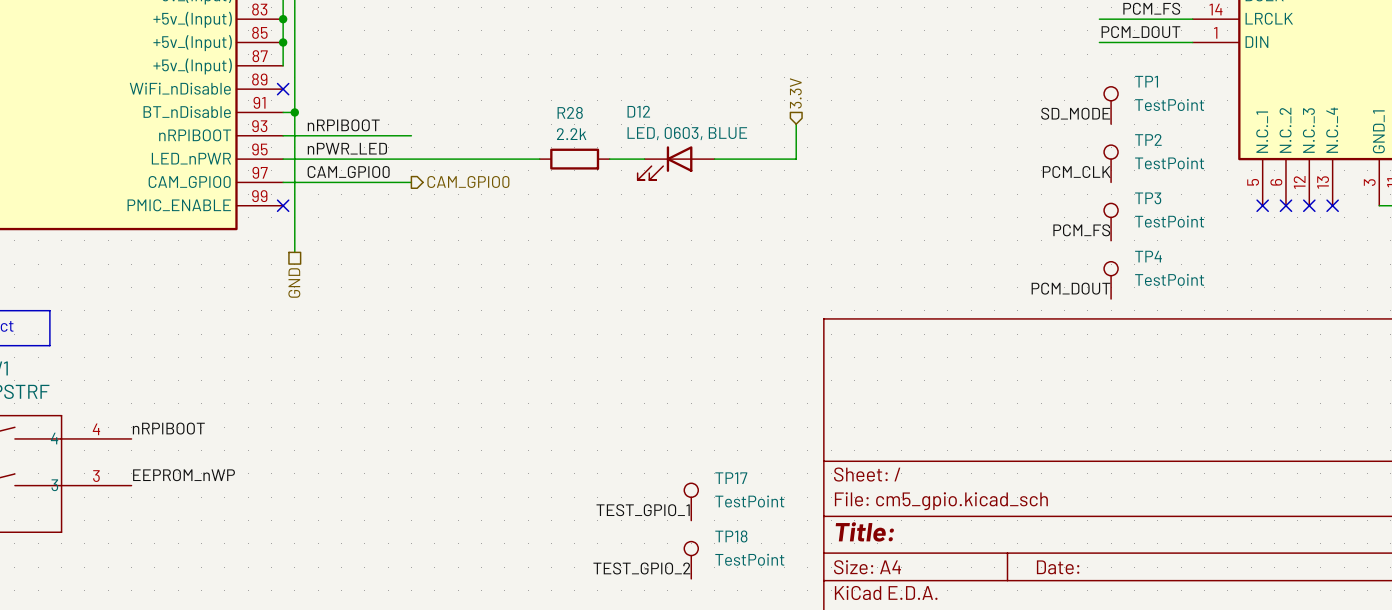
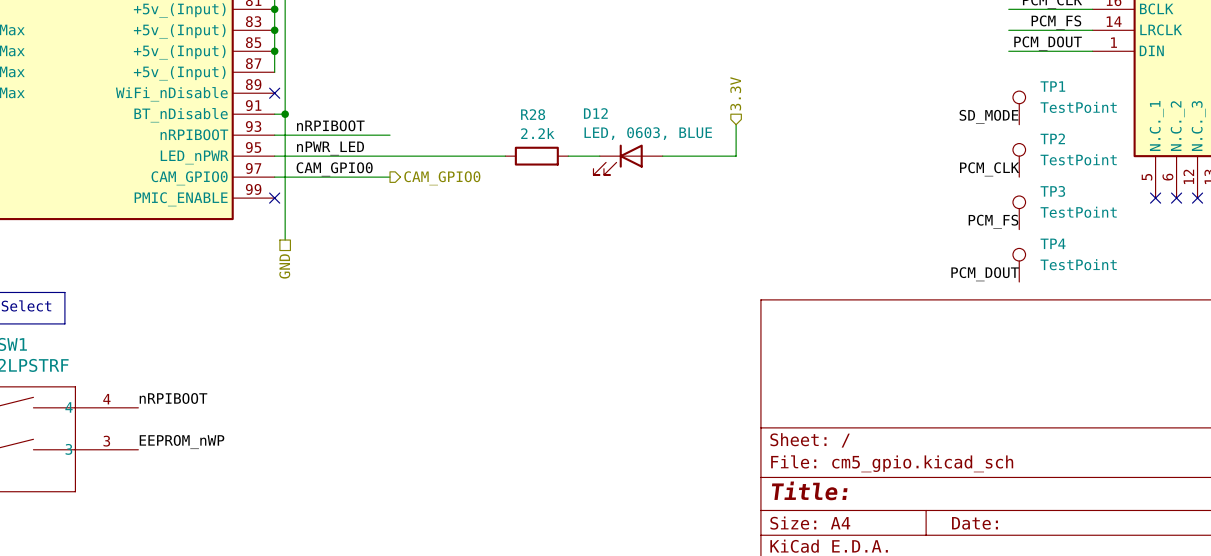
TP17: TestPoint (691, 501) -> none
label: TEST_GPIO_1 (643, 510) -> none
TP18: TestPoint (691, 560) -> none
label: TEST_GPIO_2 (641, 568) -> none

